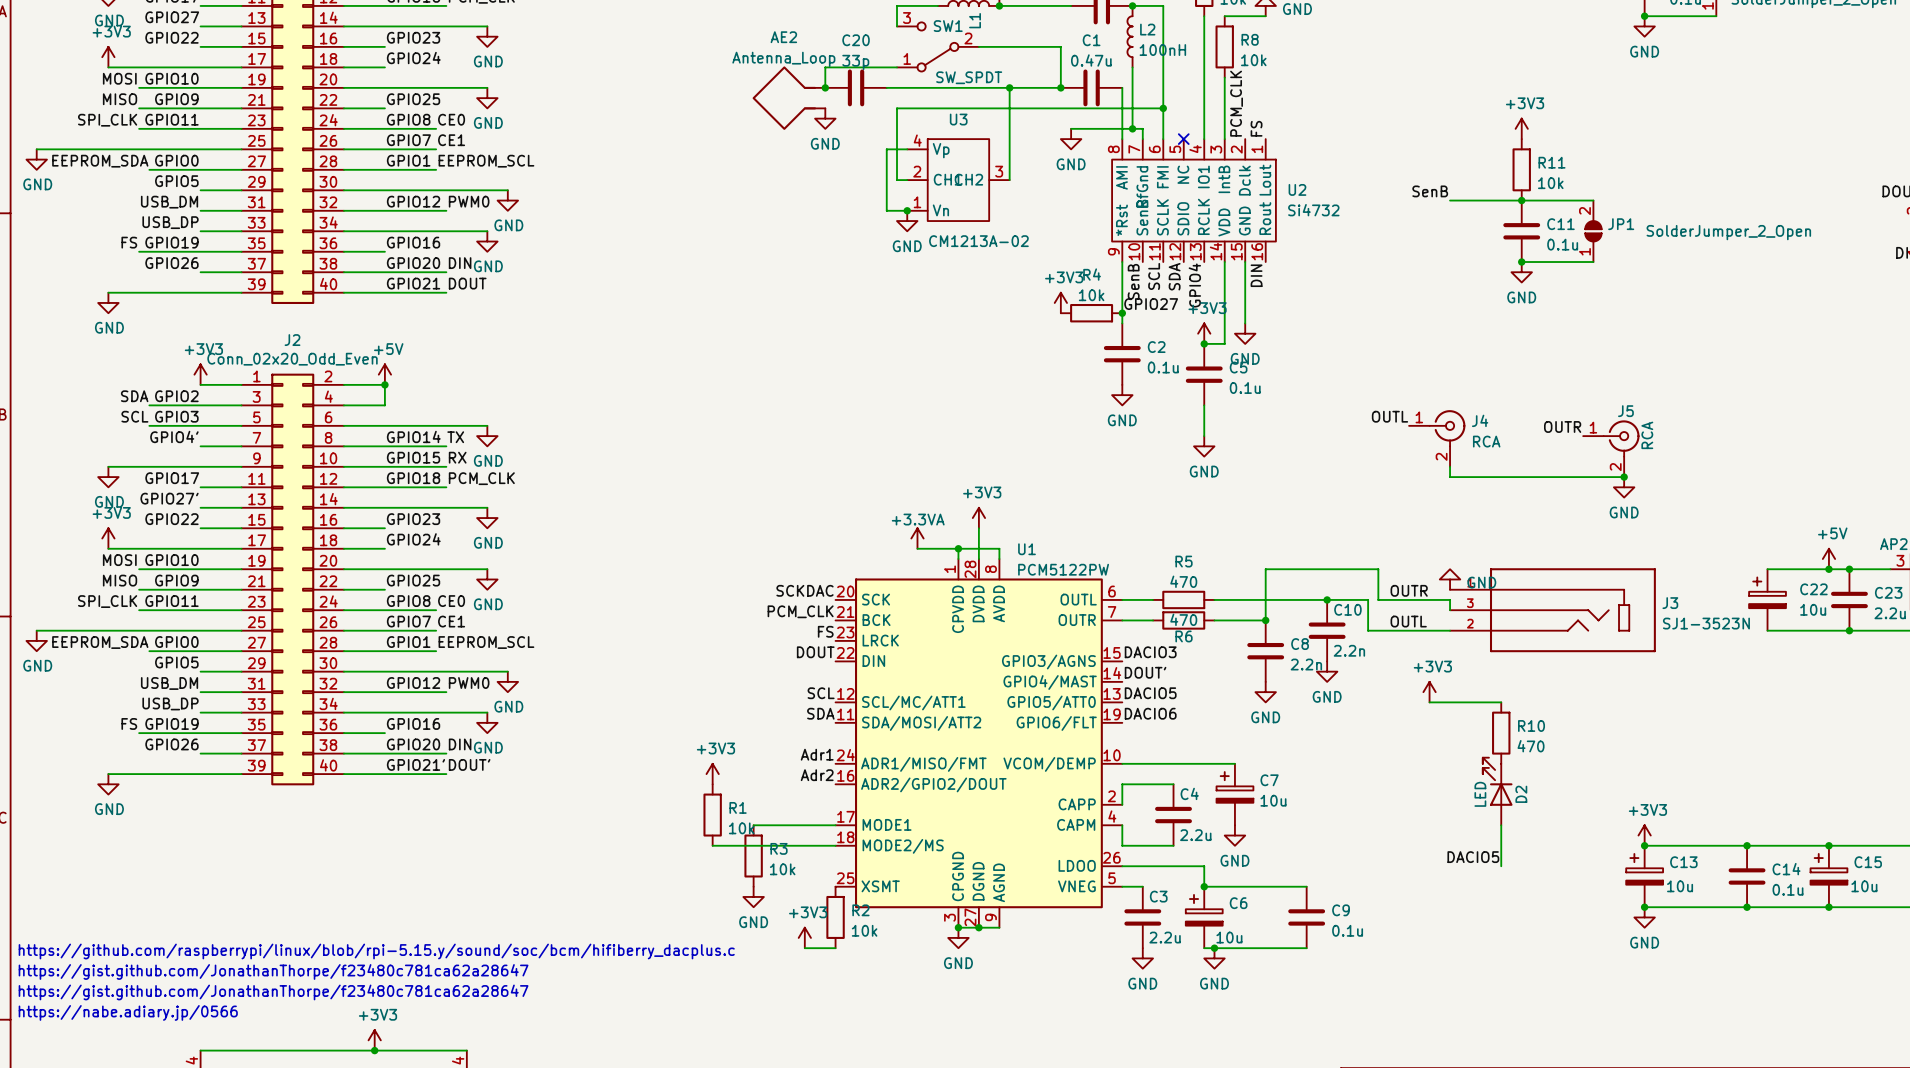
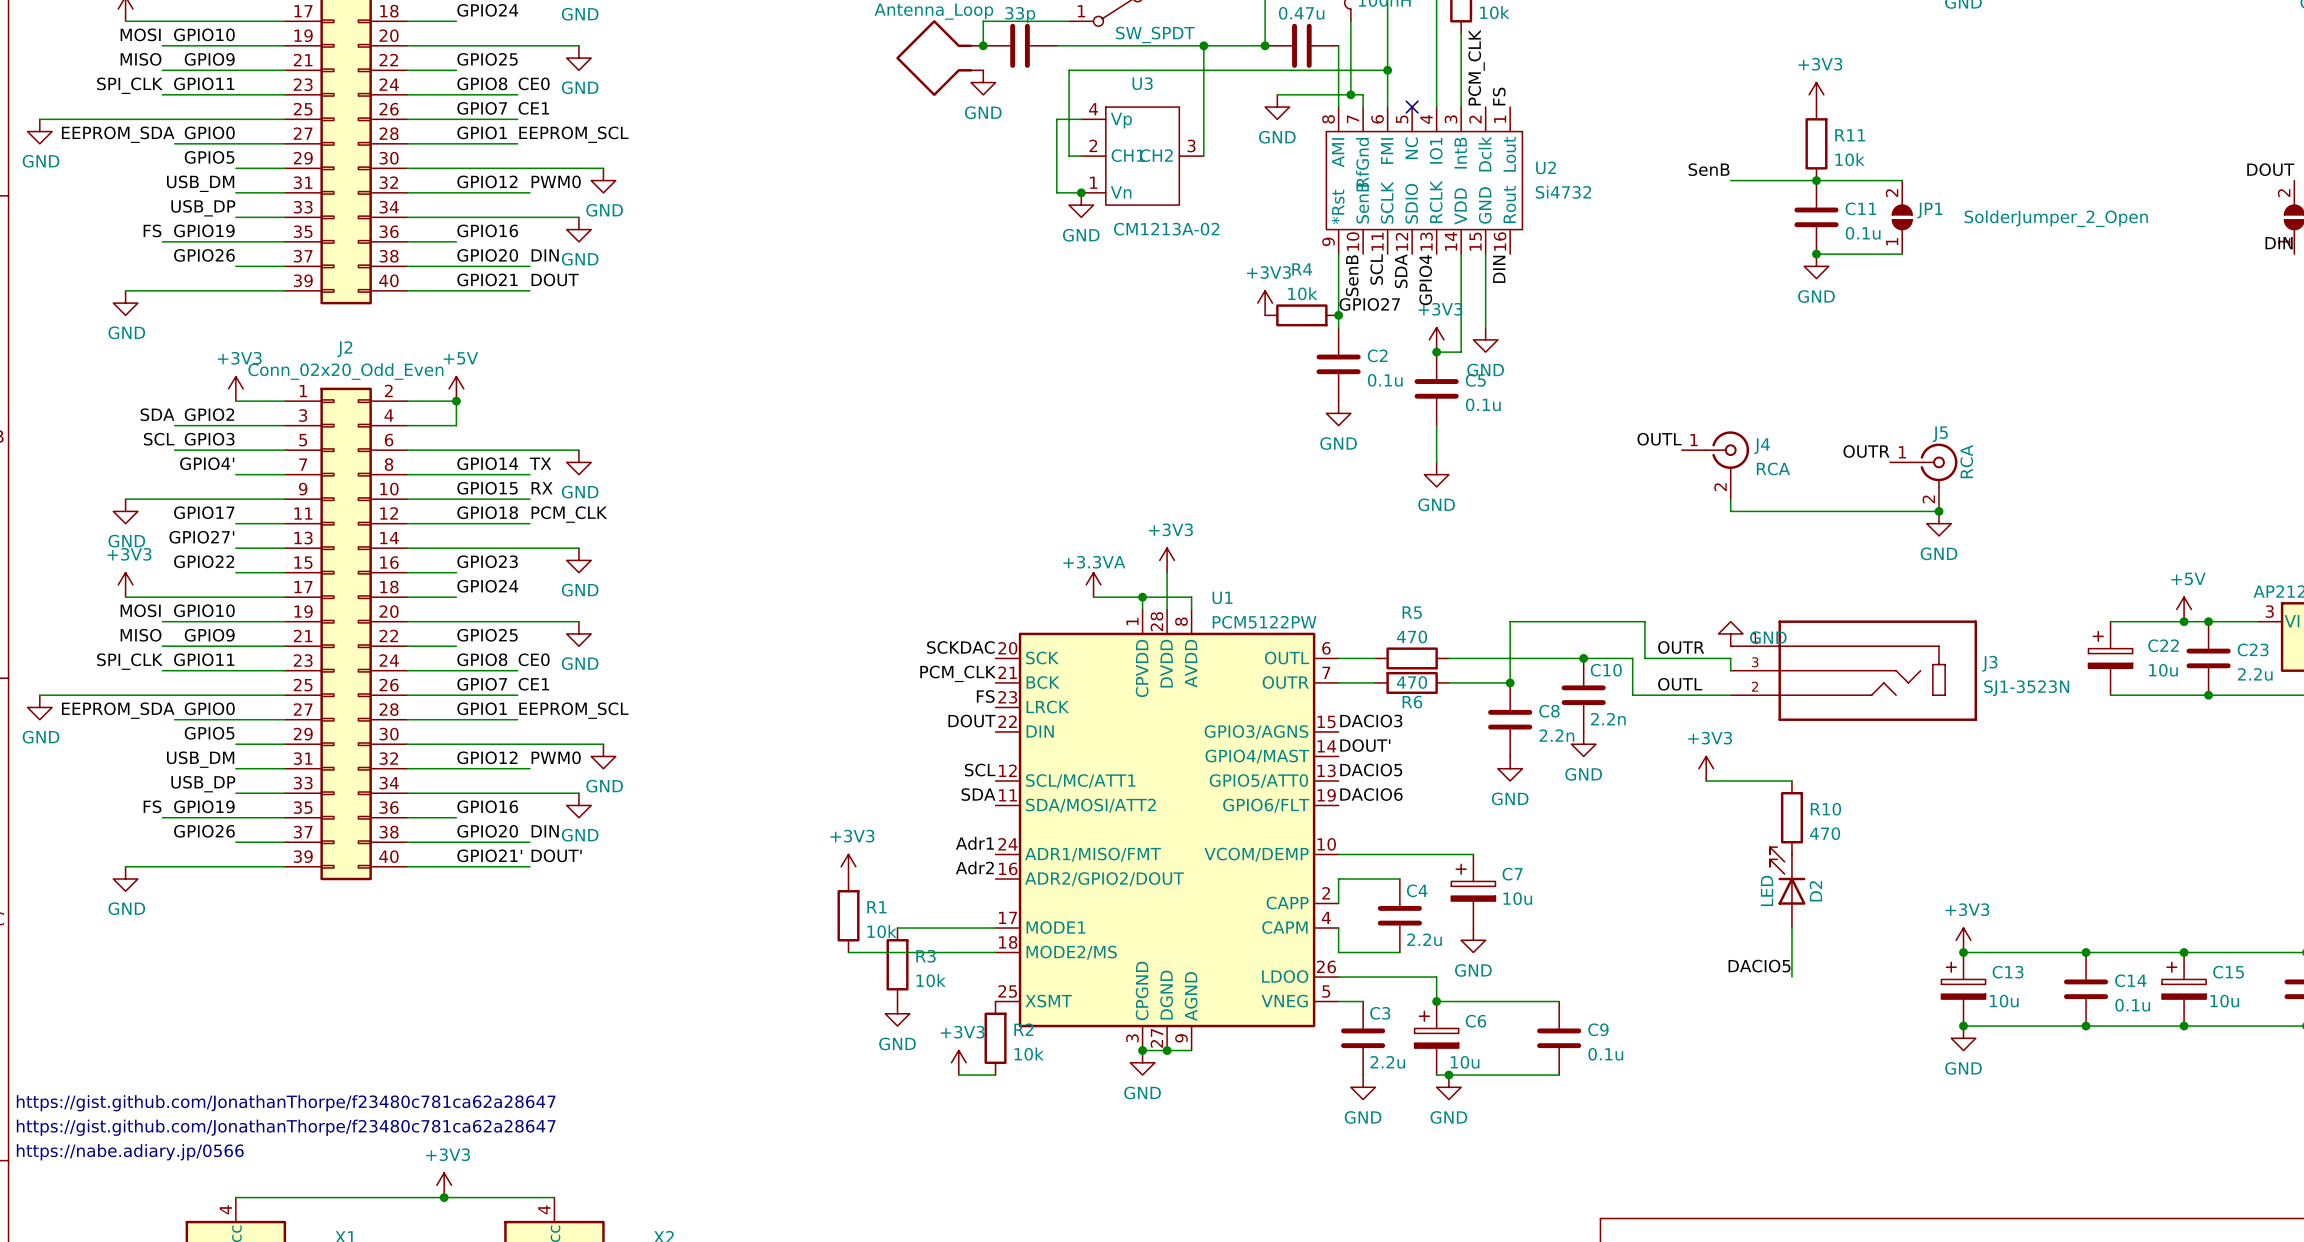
text: https://github.com/raspberrypi/linux/blob/rpi-5.15.y/sound/soc/bcm/hifiberry_dacplus.c (376, 951) -> none

